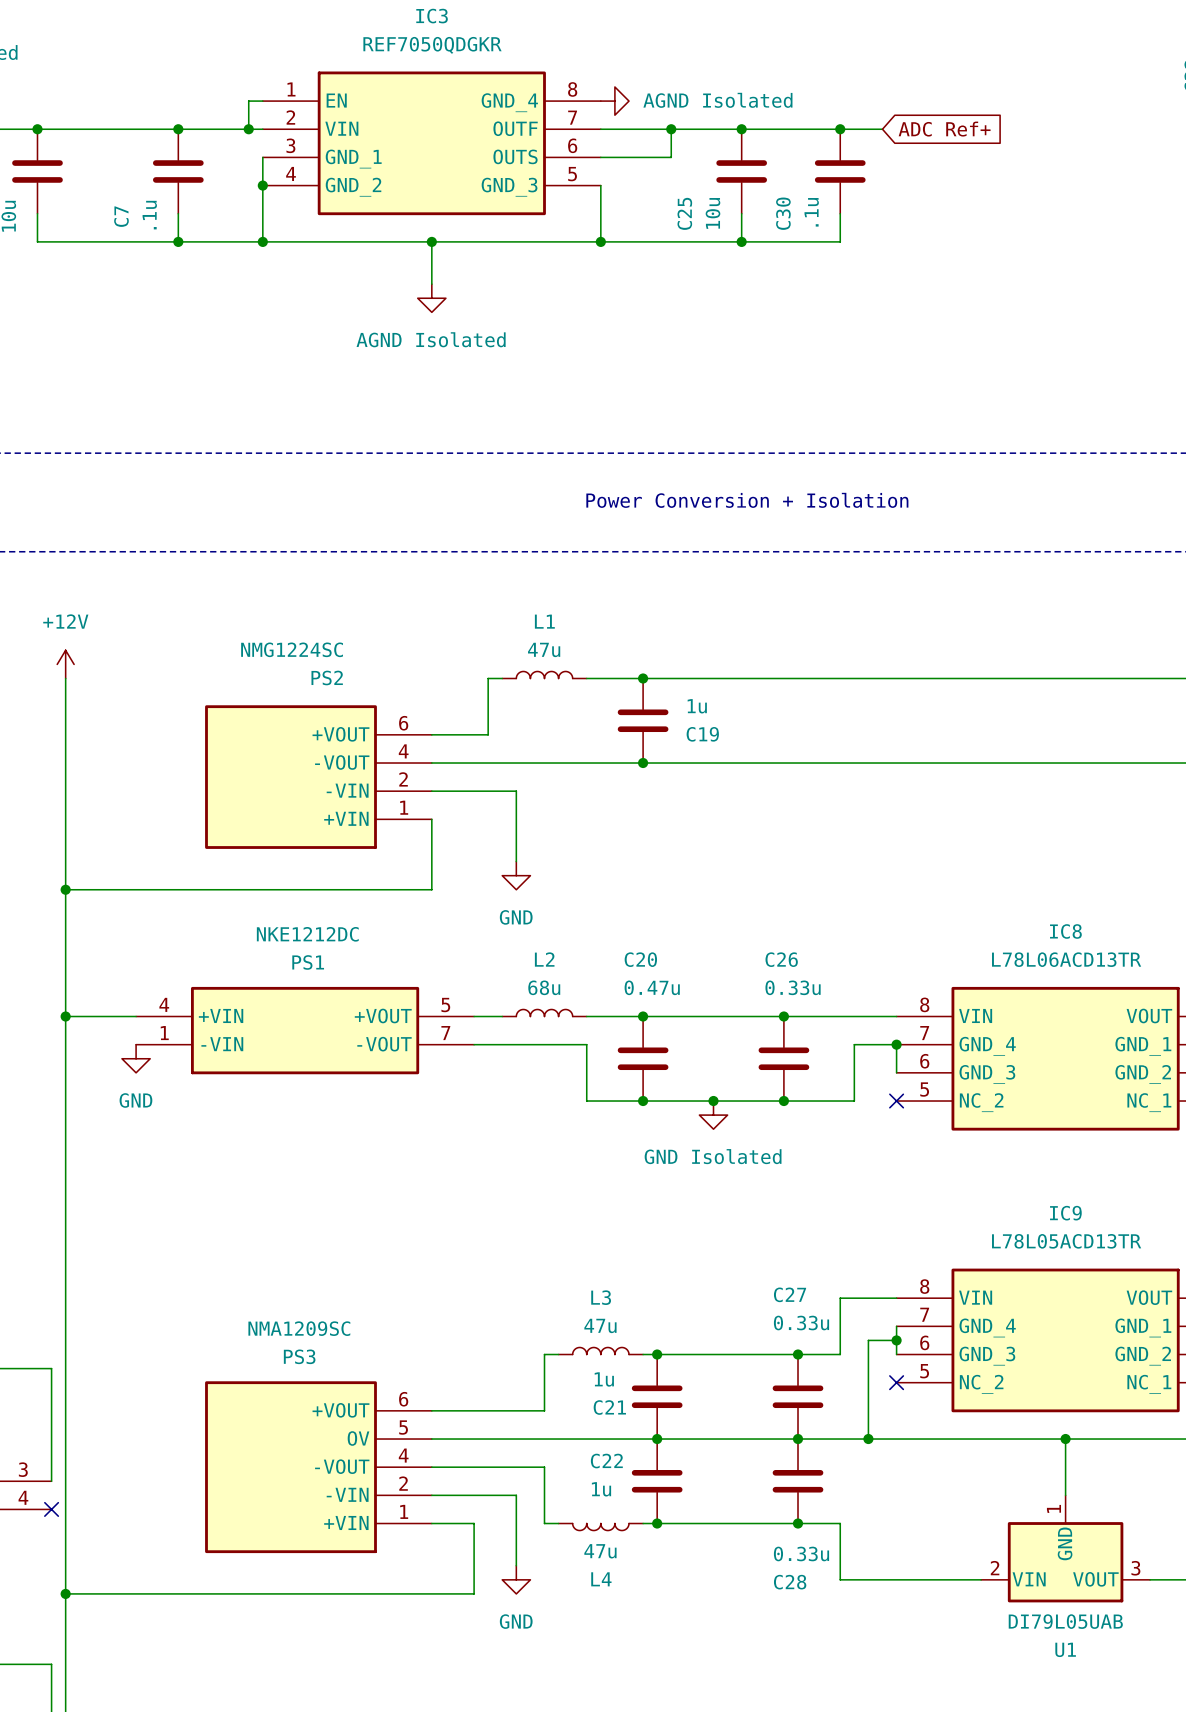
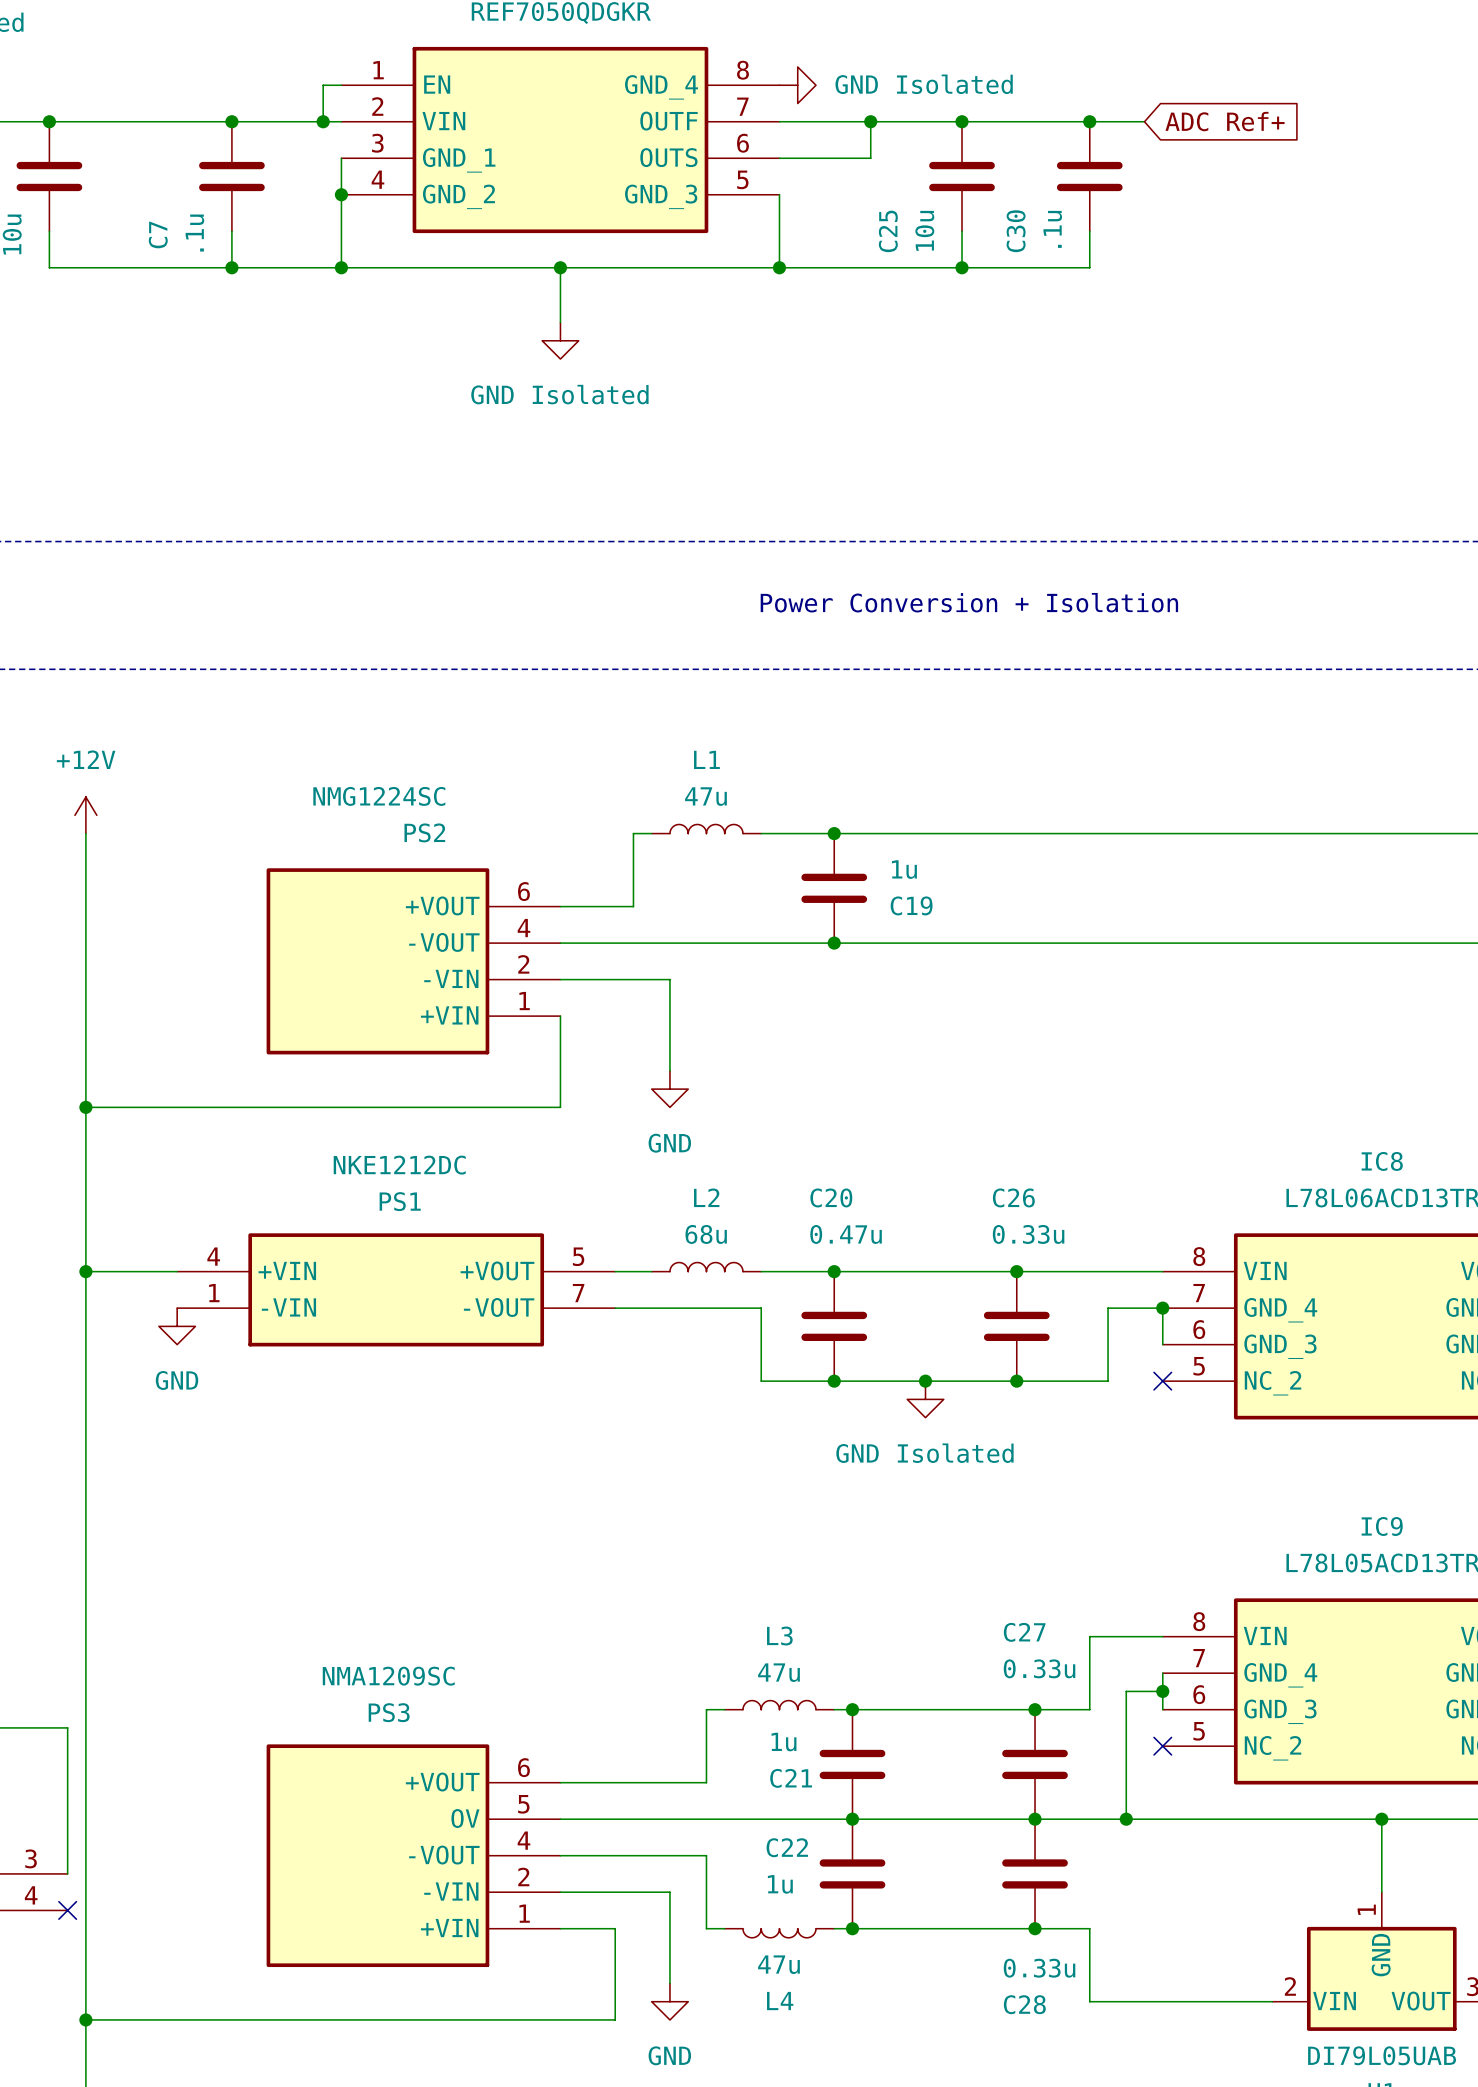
power symbol: AGND Isolated (614, 101) -> GND Isolated (797, 85)
power symbol: AGND Isolated (431, 298) -> GND Isolated (560, 340)

